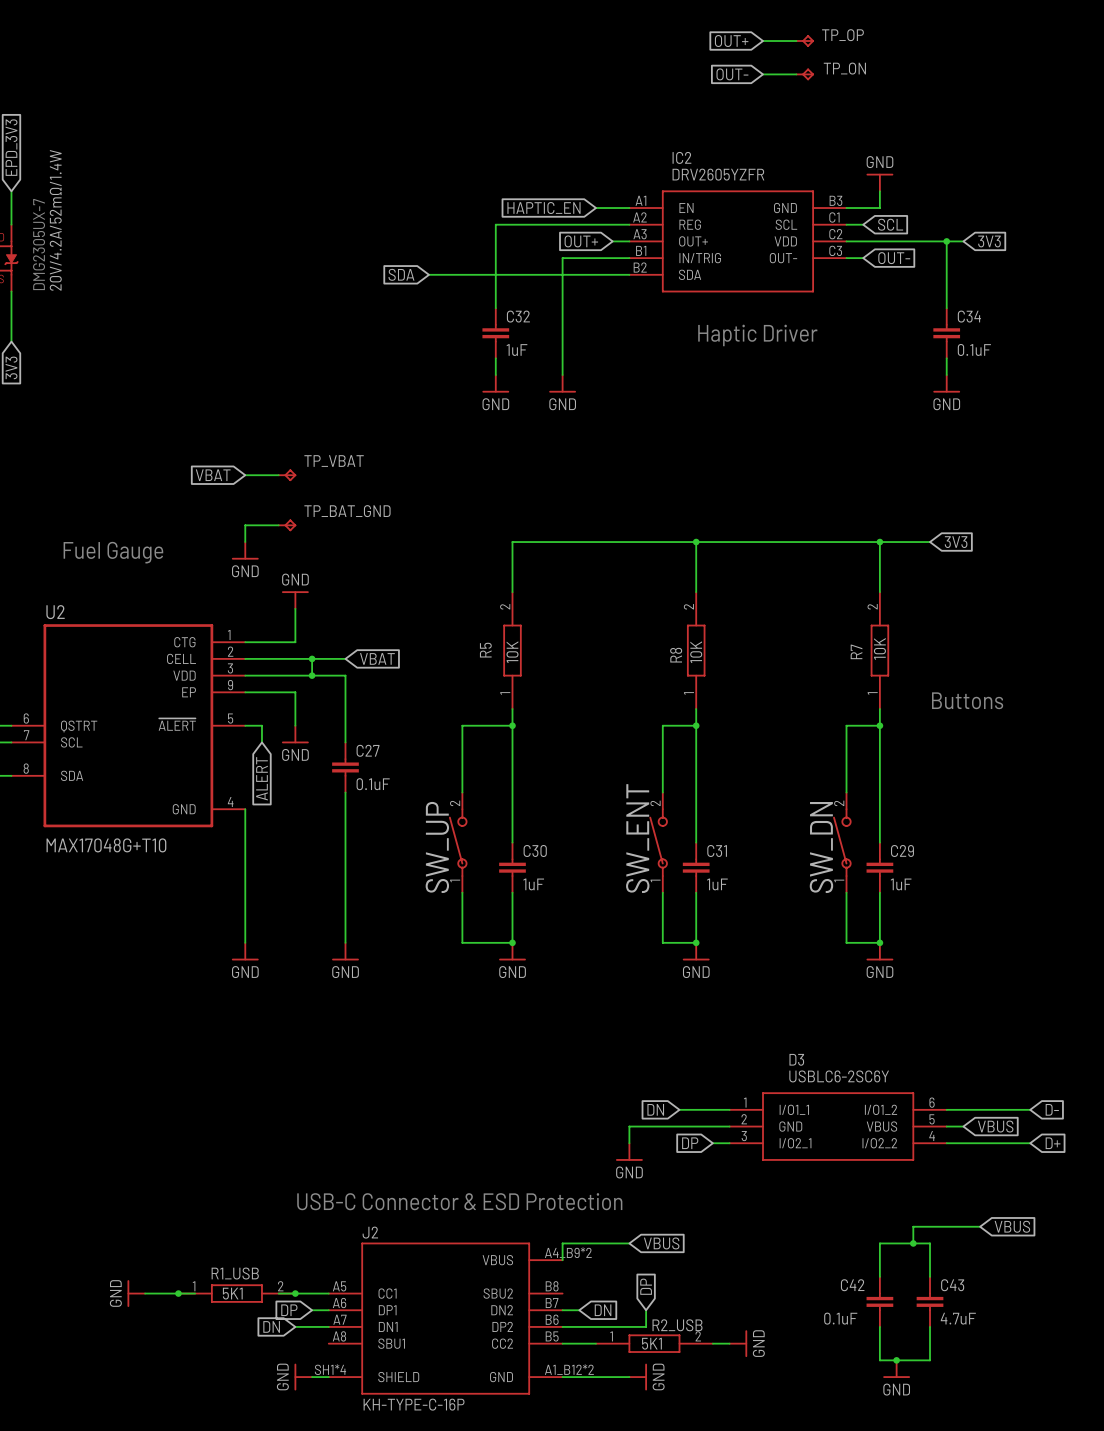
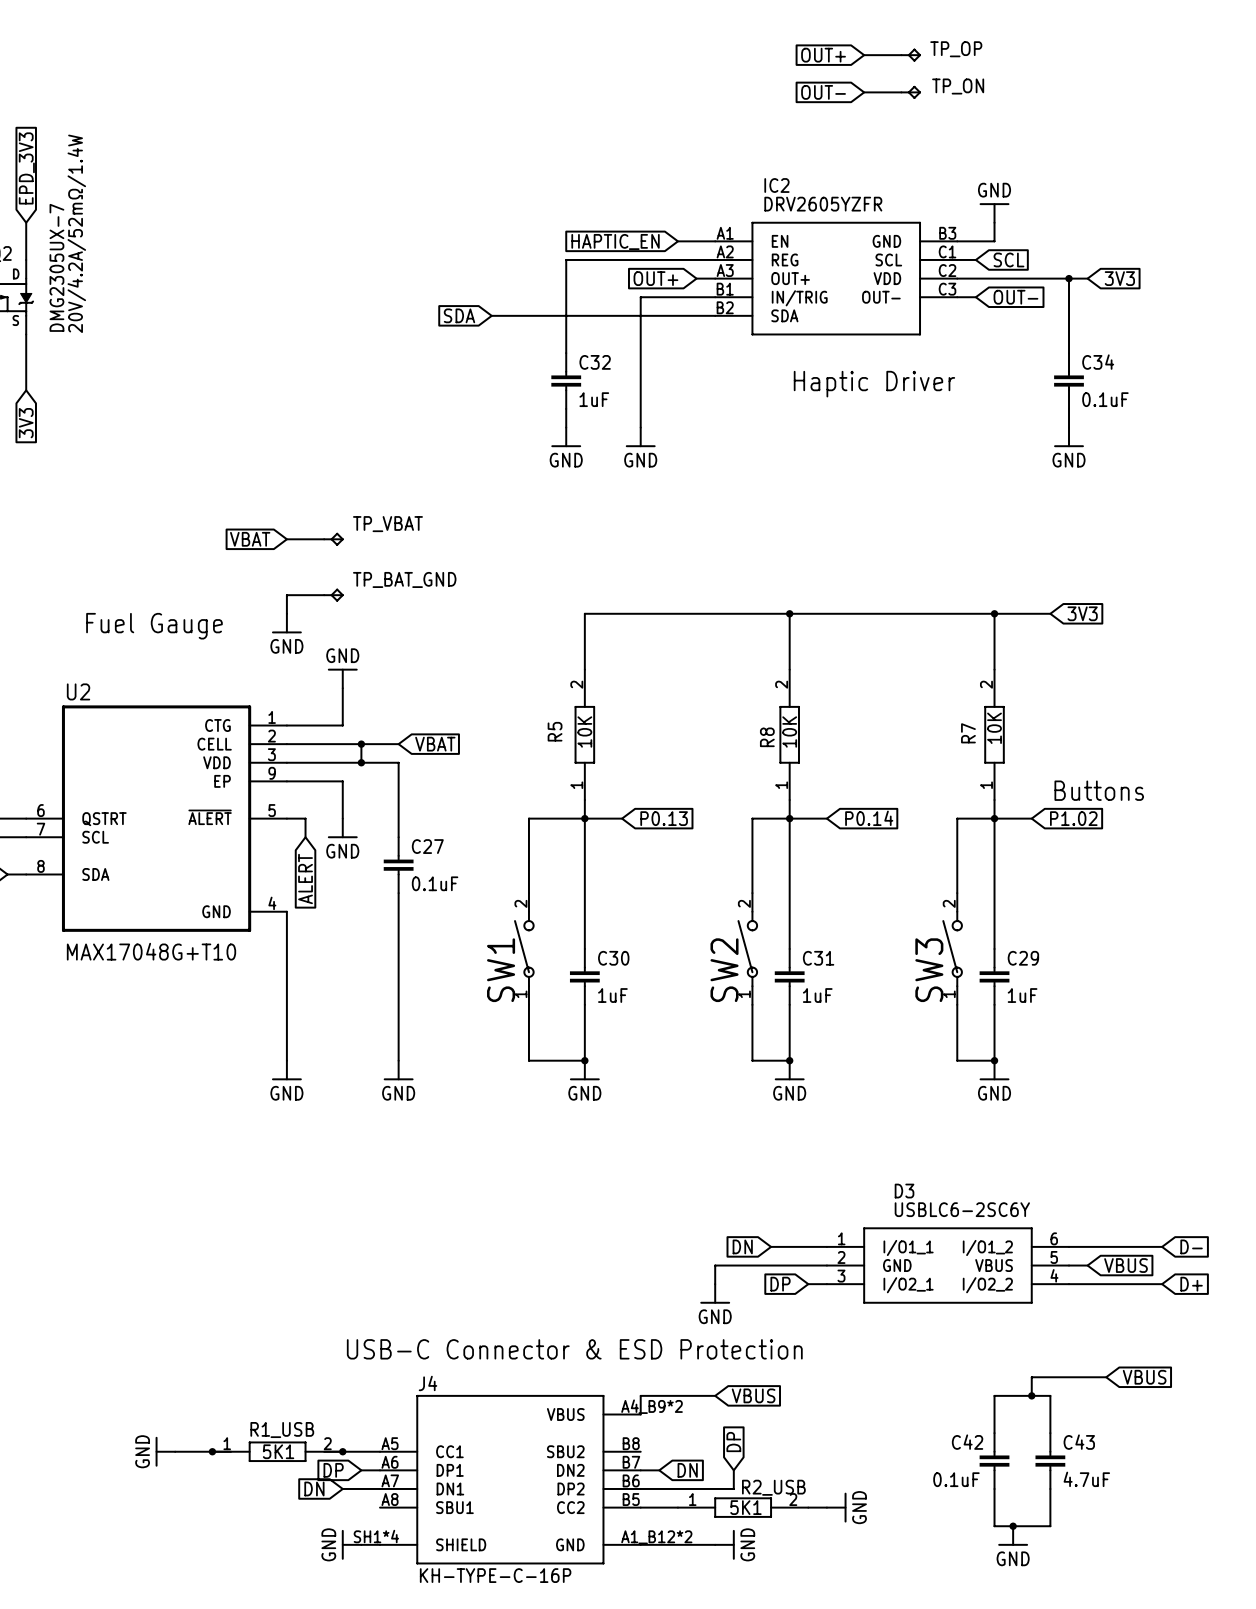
wire: none -> (584, 818) (622, 818)
global label: none -> P0.13 (664, 818)
wire: none -> (789, 818) (826, 818)
global label: none -> P0.14 (869, 818)
wire: none -> (994, 818) (1031, 818)
global label: none -> P1.02 (1073, 818)
SW_ENT name: SW_ENT (637, 838) -> SW2 (724, 970)
SW_UP name: SW_UP (437, 847) -> SW1 (501, 970)
SW_DN name: SW_DN (821, 847) -> SW3 (929, 970)
J2 name: J2 (370, 1232) -> J4 (428, 1383)

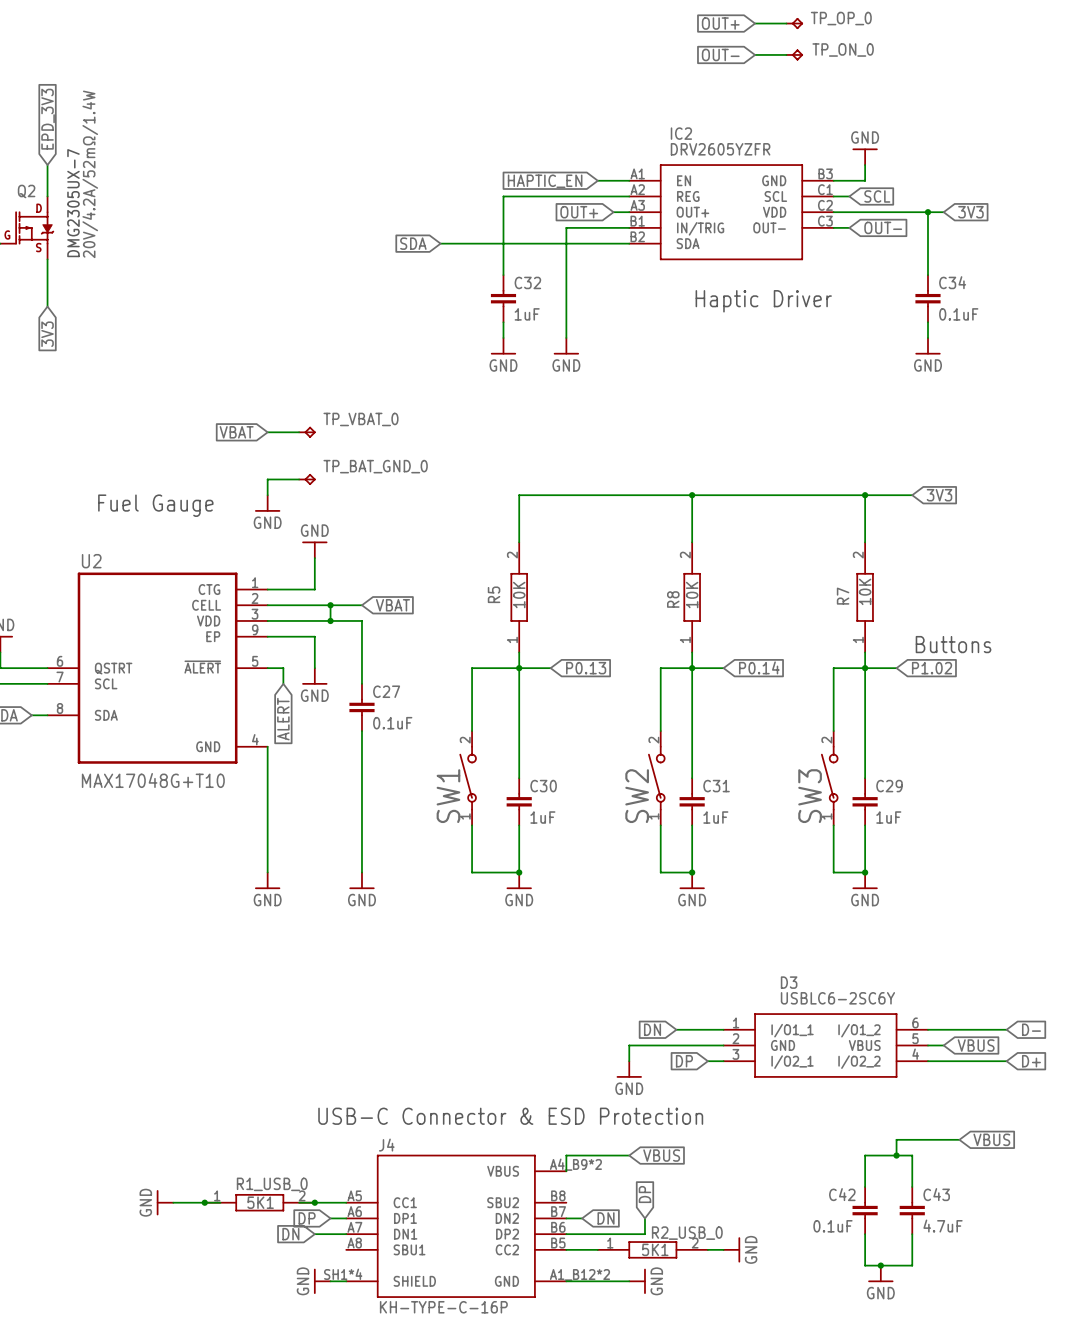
TP_OP name: TP_OP (956, 49) -> TP_OP_0 (841, 18)
TP_ON name: TP_ON (958, 86) -> TP_ON_0 (843, 50)
TP_VBAT name: TP_VBAT (387, 524) -> TP_VBAT_0 (360, 419)
TP_BAT_GND name: TP_BAT_GND (404, 579) -> TP_BAT_GND_0 (375, 466)
R1_USB name: R1_USB (282, 1430) -> R1_USB_0 (272, 1184)
R2_USB name: R2_USB (773, 1487) -> R2_USB_0 (687, 1233)

